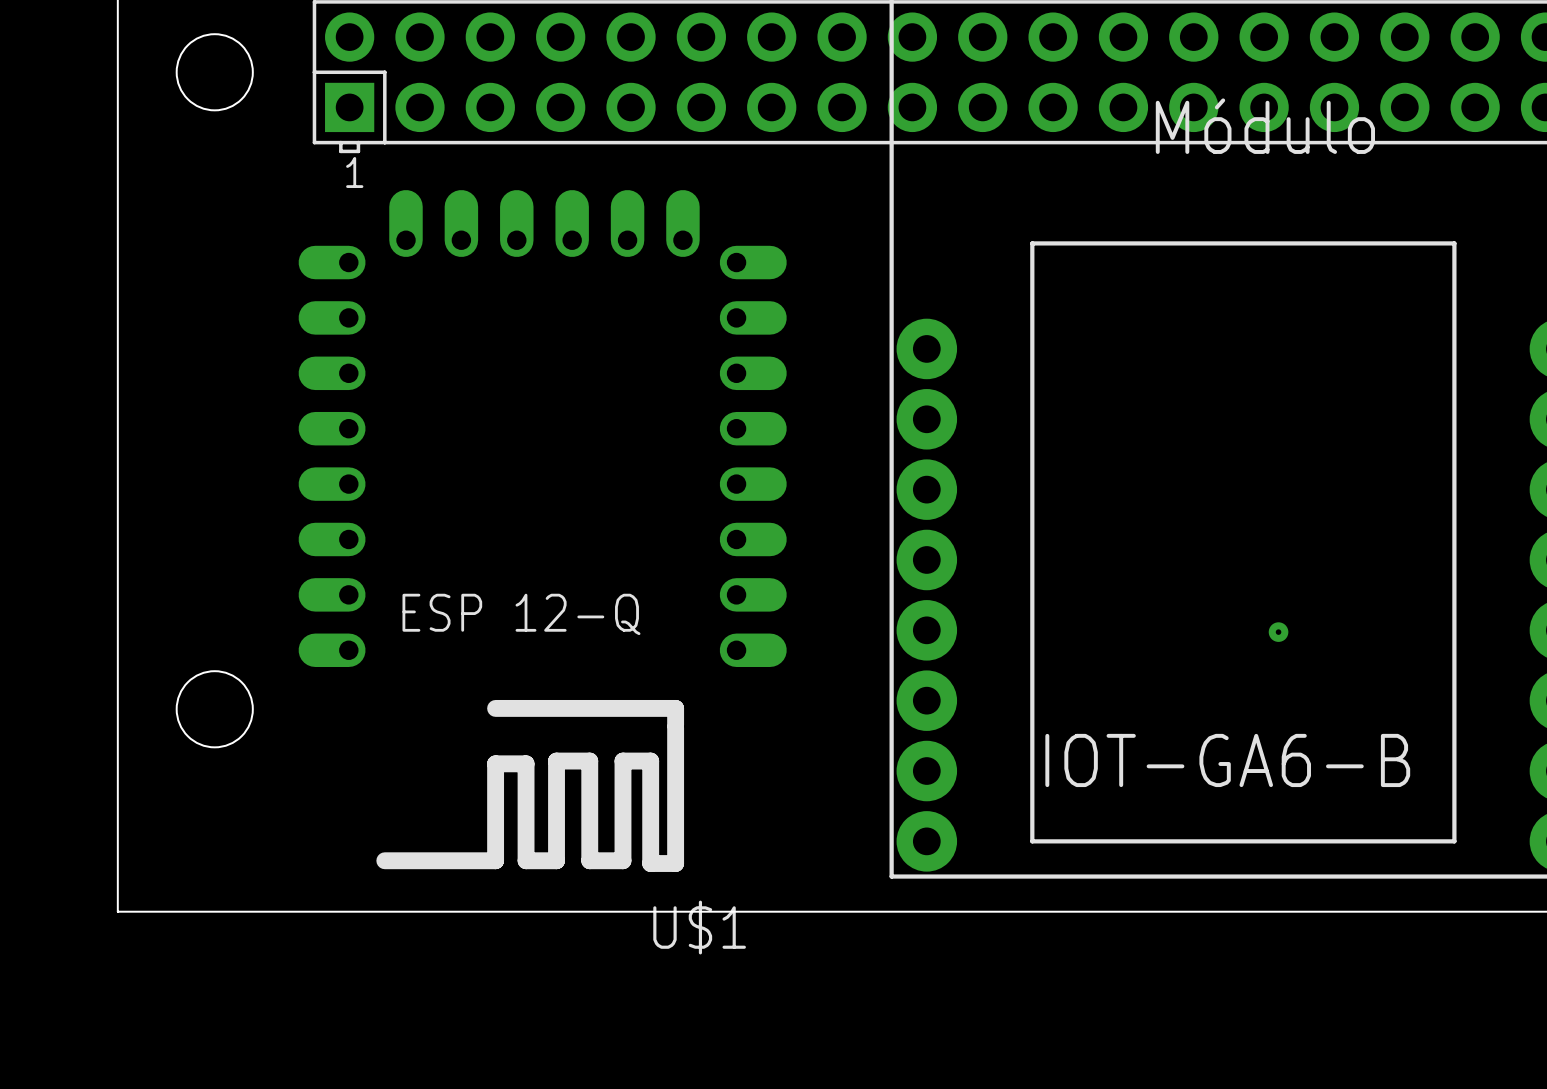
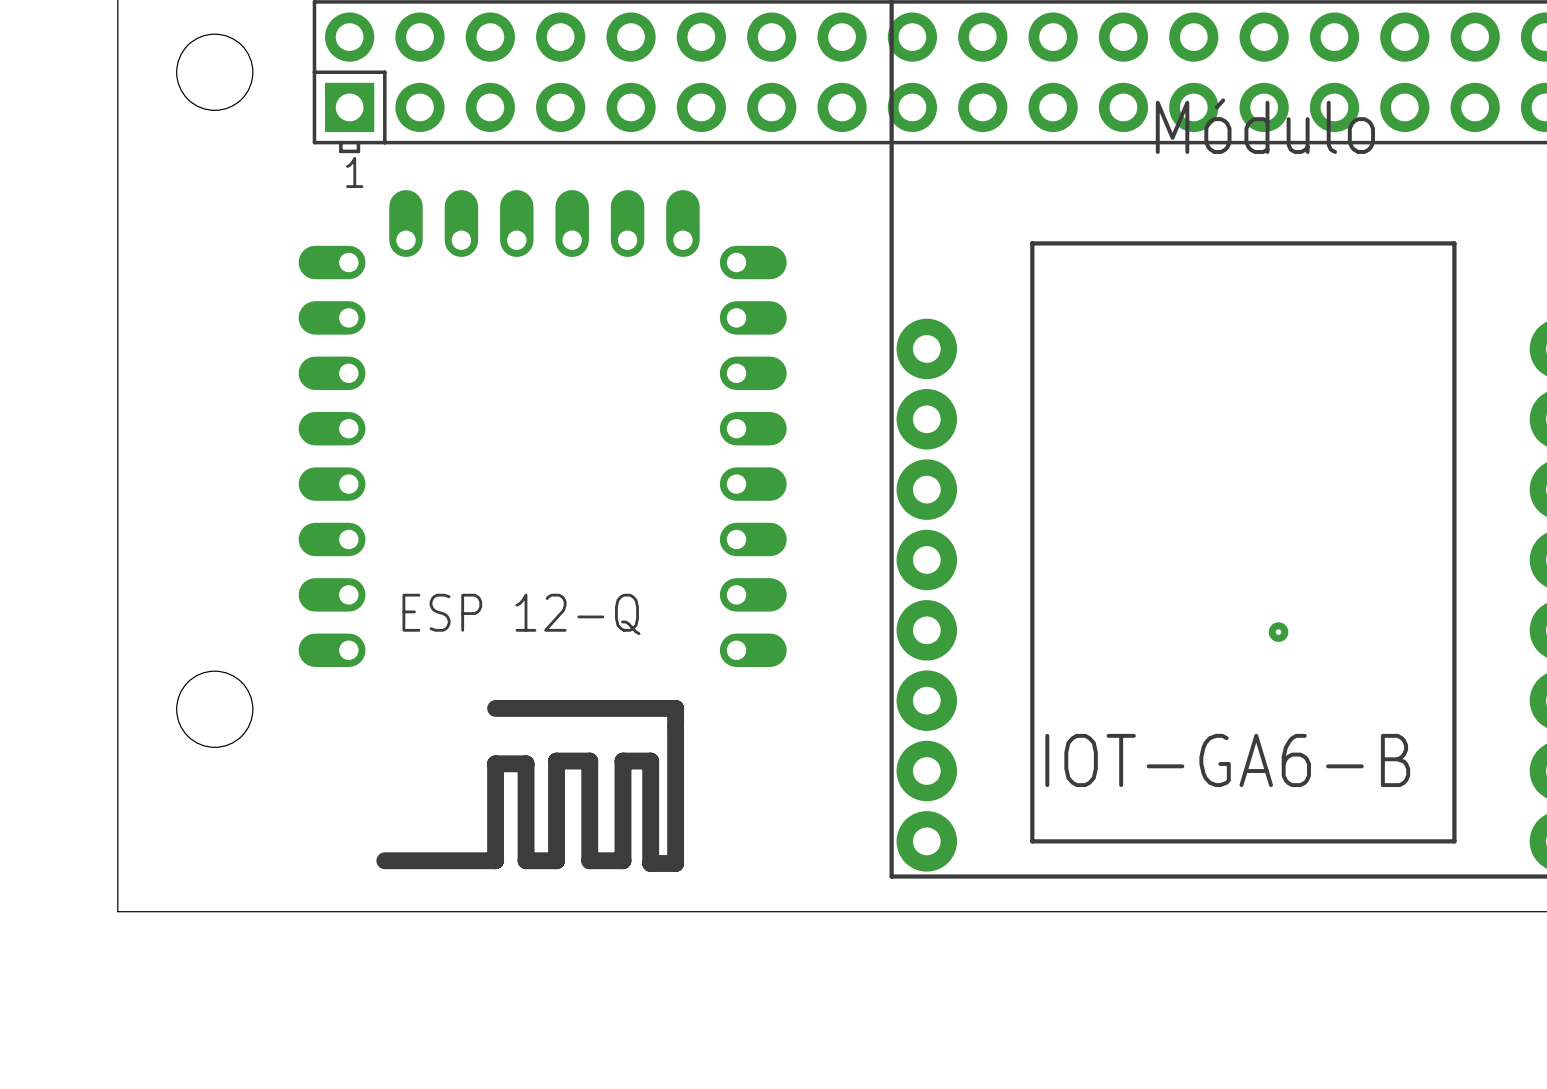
U$1 name: U$1 (699, 927) -> none

